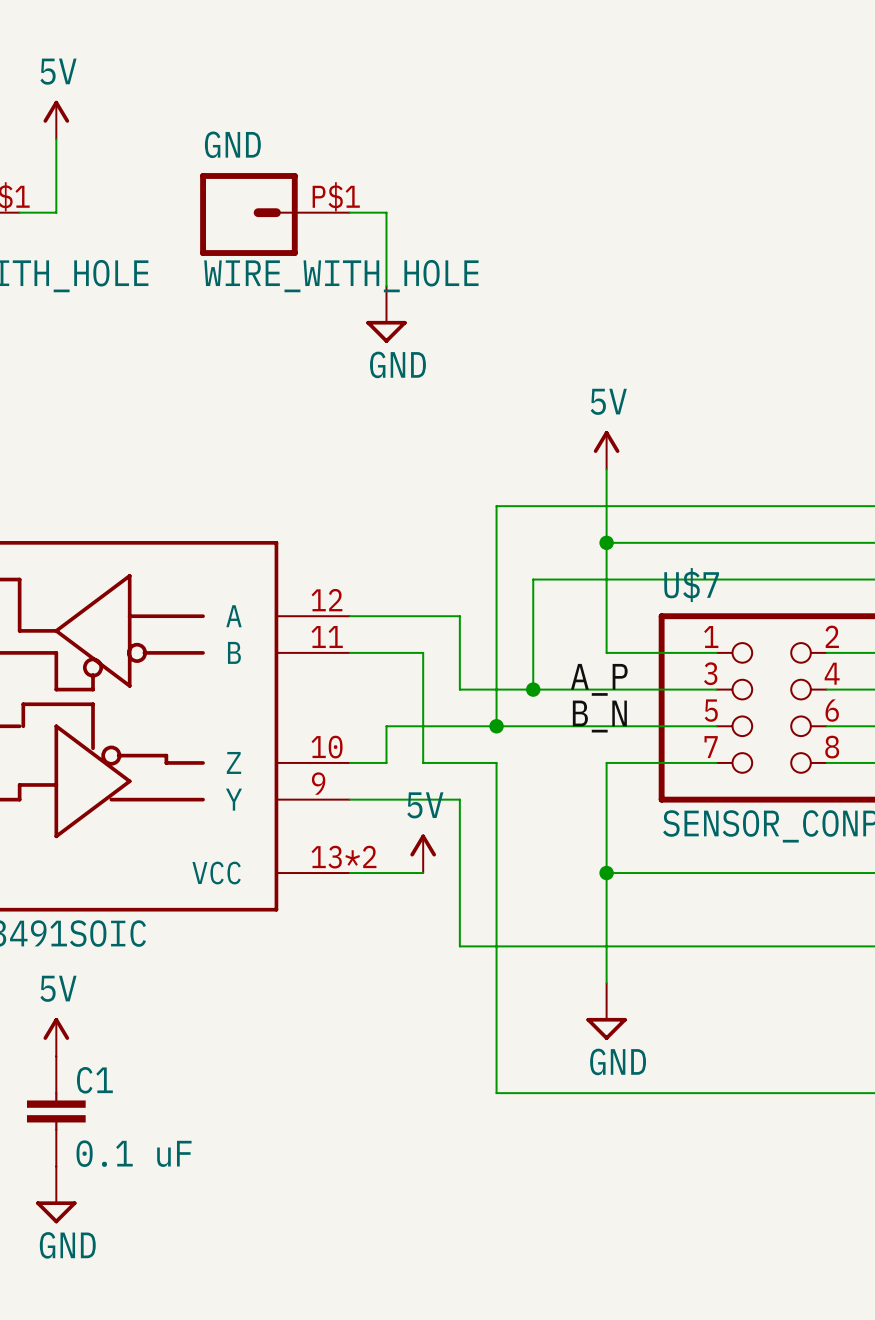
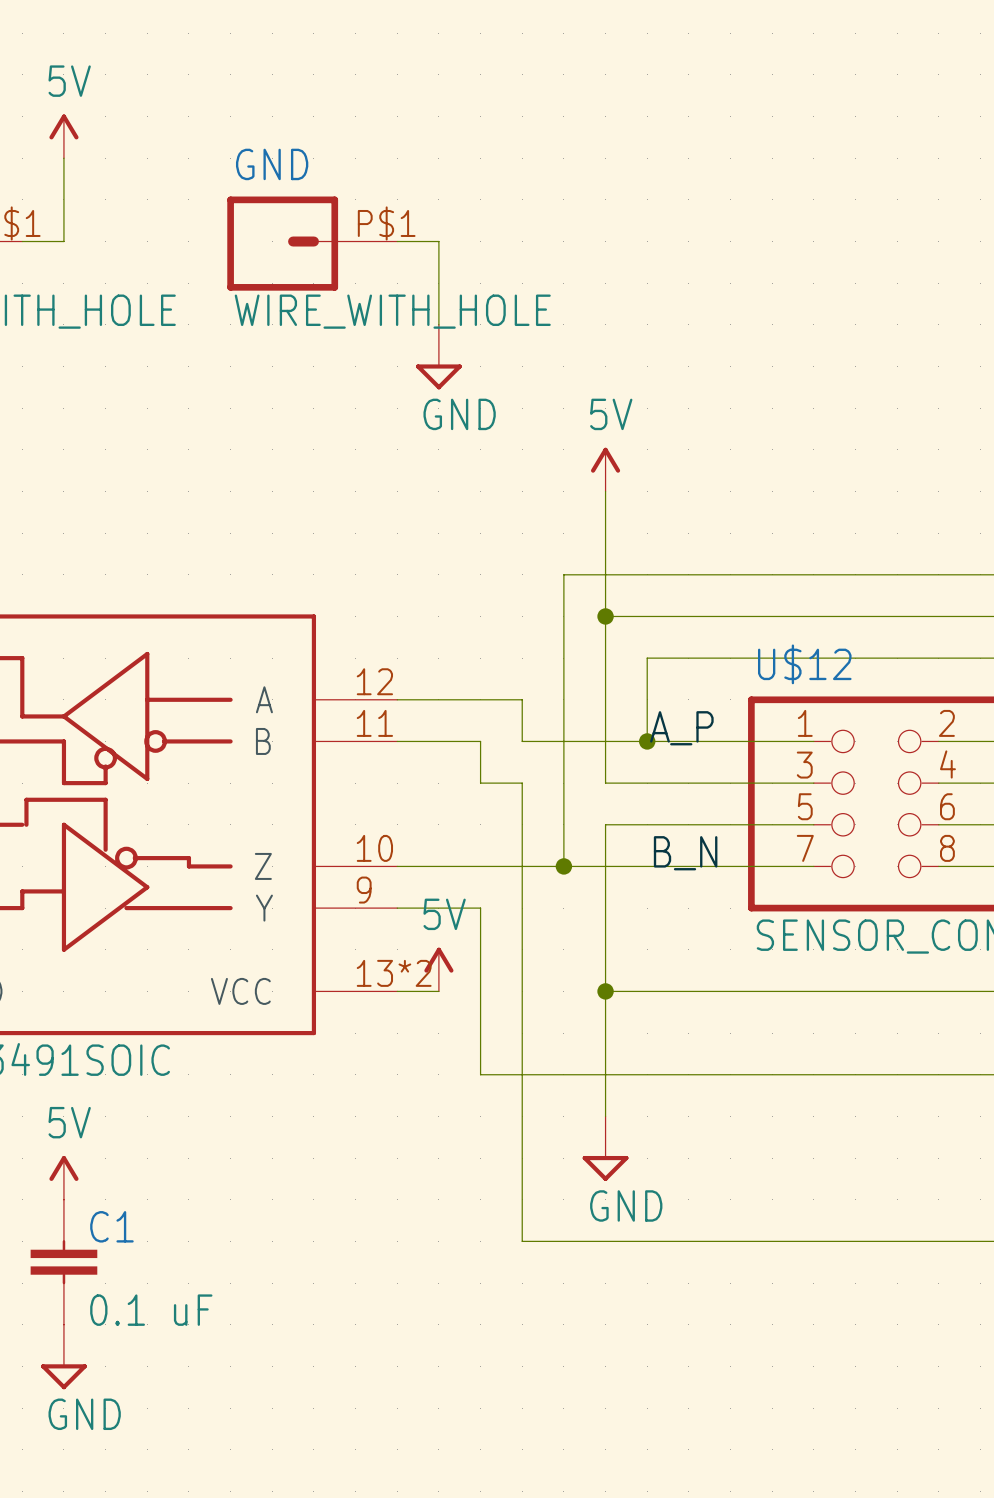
wire: none -> (605, 491) (605, 658)
power symbol position: 5V (606, 450) -> 5V (605, 469)
wire: (606, 469) (606, 652) -> none
wire: none -> (605, 616) (688, 616)
junction: none -> (605, 616)
junction: (606, 542) -> none
wire: (533, 579) (569, 579) -> (647, 741) (647, 658)
U$7 name: U$7 (691, 585) -> U$12 (804, 664)
wire: (459, 652) (459, 689) (533, 689) -> (522, 741) (688, 741)
junction: none -> (647, 741)
label position: A_P (599, 679) -> A_P (681, 728)
wire: (423, 689) (423, 762) -> (480, 783) (522, 783) (522, 908)
junction: (533, 689) -> none
label position: B_N (599, 716) -> B_N (685, 853)
junction position: (496, 726) -> (563, 866)
wire: (533, 726) (386, 726) (386, 762) -> (480, 866) (438, 866)
wire: none -> (605, 824) (605, 1116)
wire: (496, 762) (496, 1093) -> (480, 908) (480, 1074) (522, 1074) (522, 1241) (563, 1241)
wire: (606, 762) (606, 983) -> (688, 866) (563, 866) (563, 824)
wire: (423, 799) (459, 799) -> none
power symbol position: 5V (423, 853) -> 5V (438, 969)
wire: (386, 873) (423, 873) -> none
wire: none -> (605, 991) (688, 991)
junction position: (606, 873) -> (605, 991)
power symbol position: GND (606, 1011) -> GND (605, 1148)

